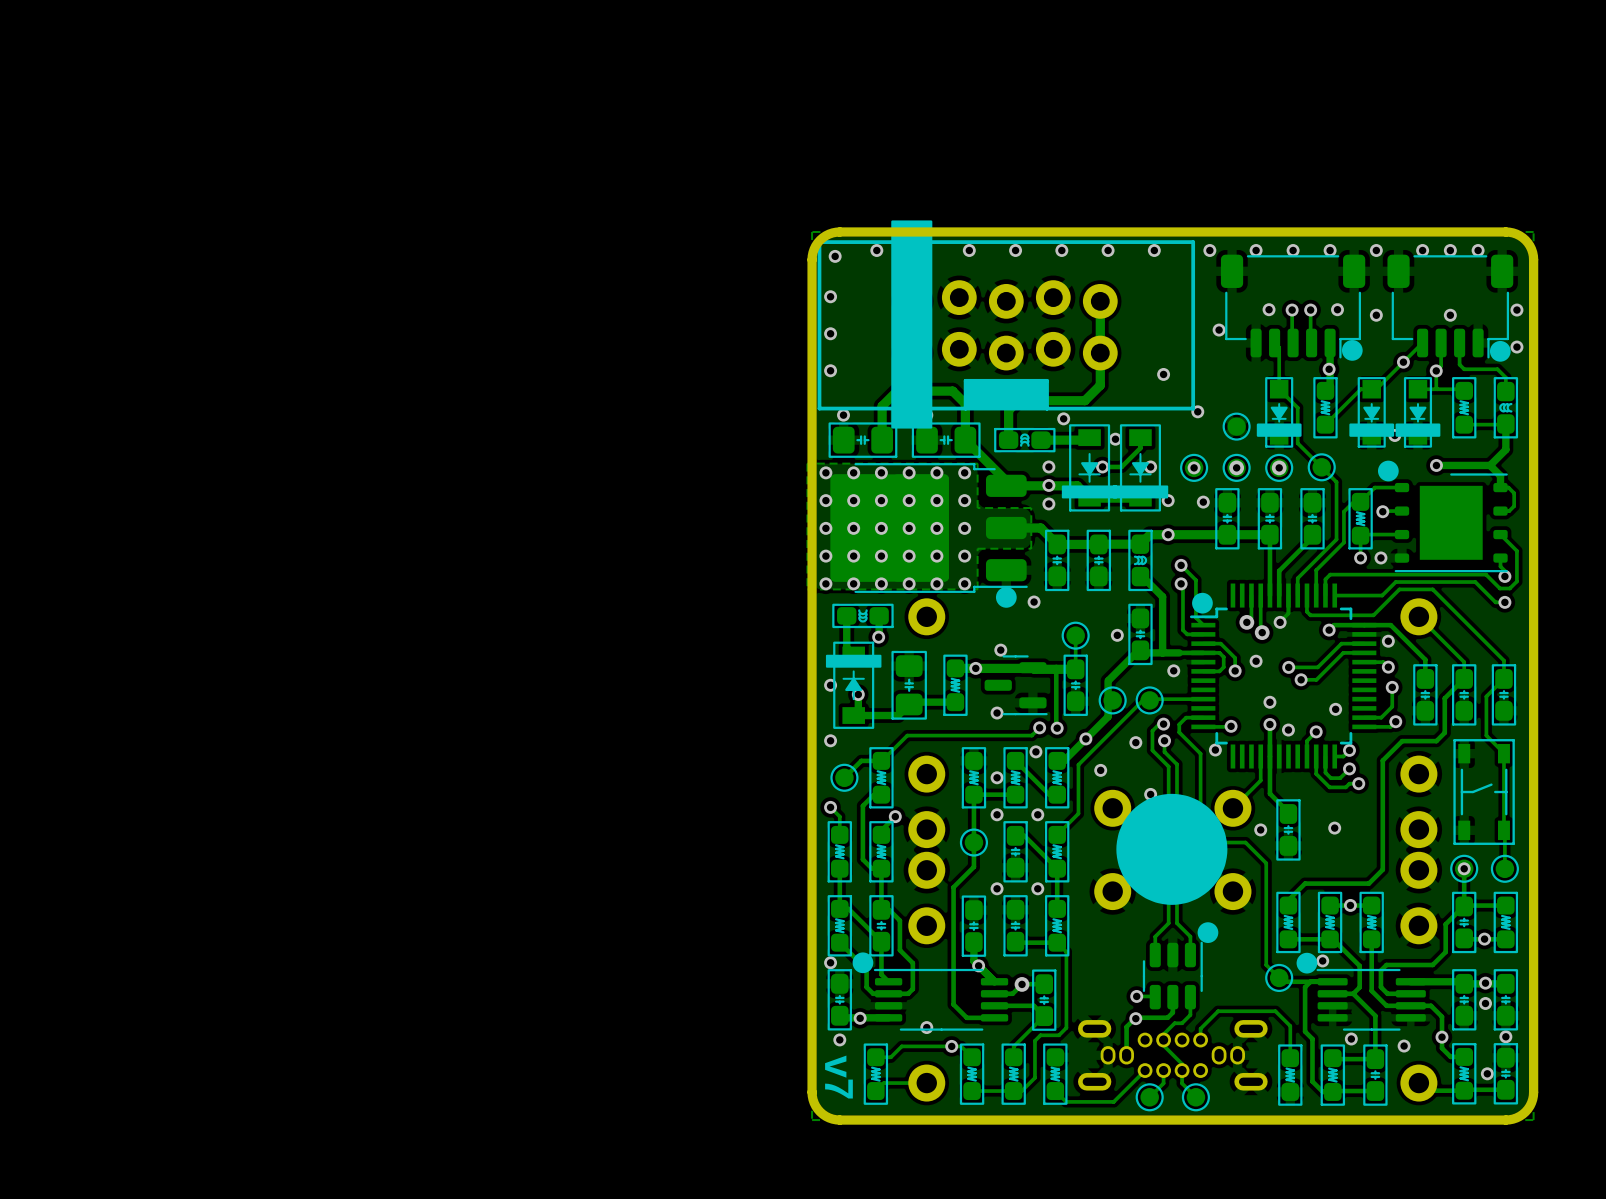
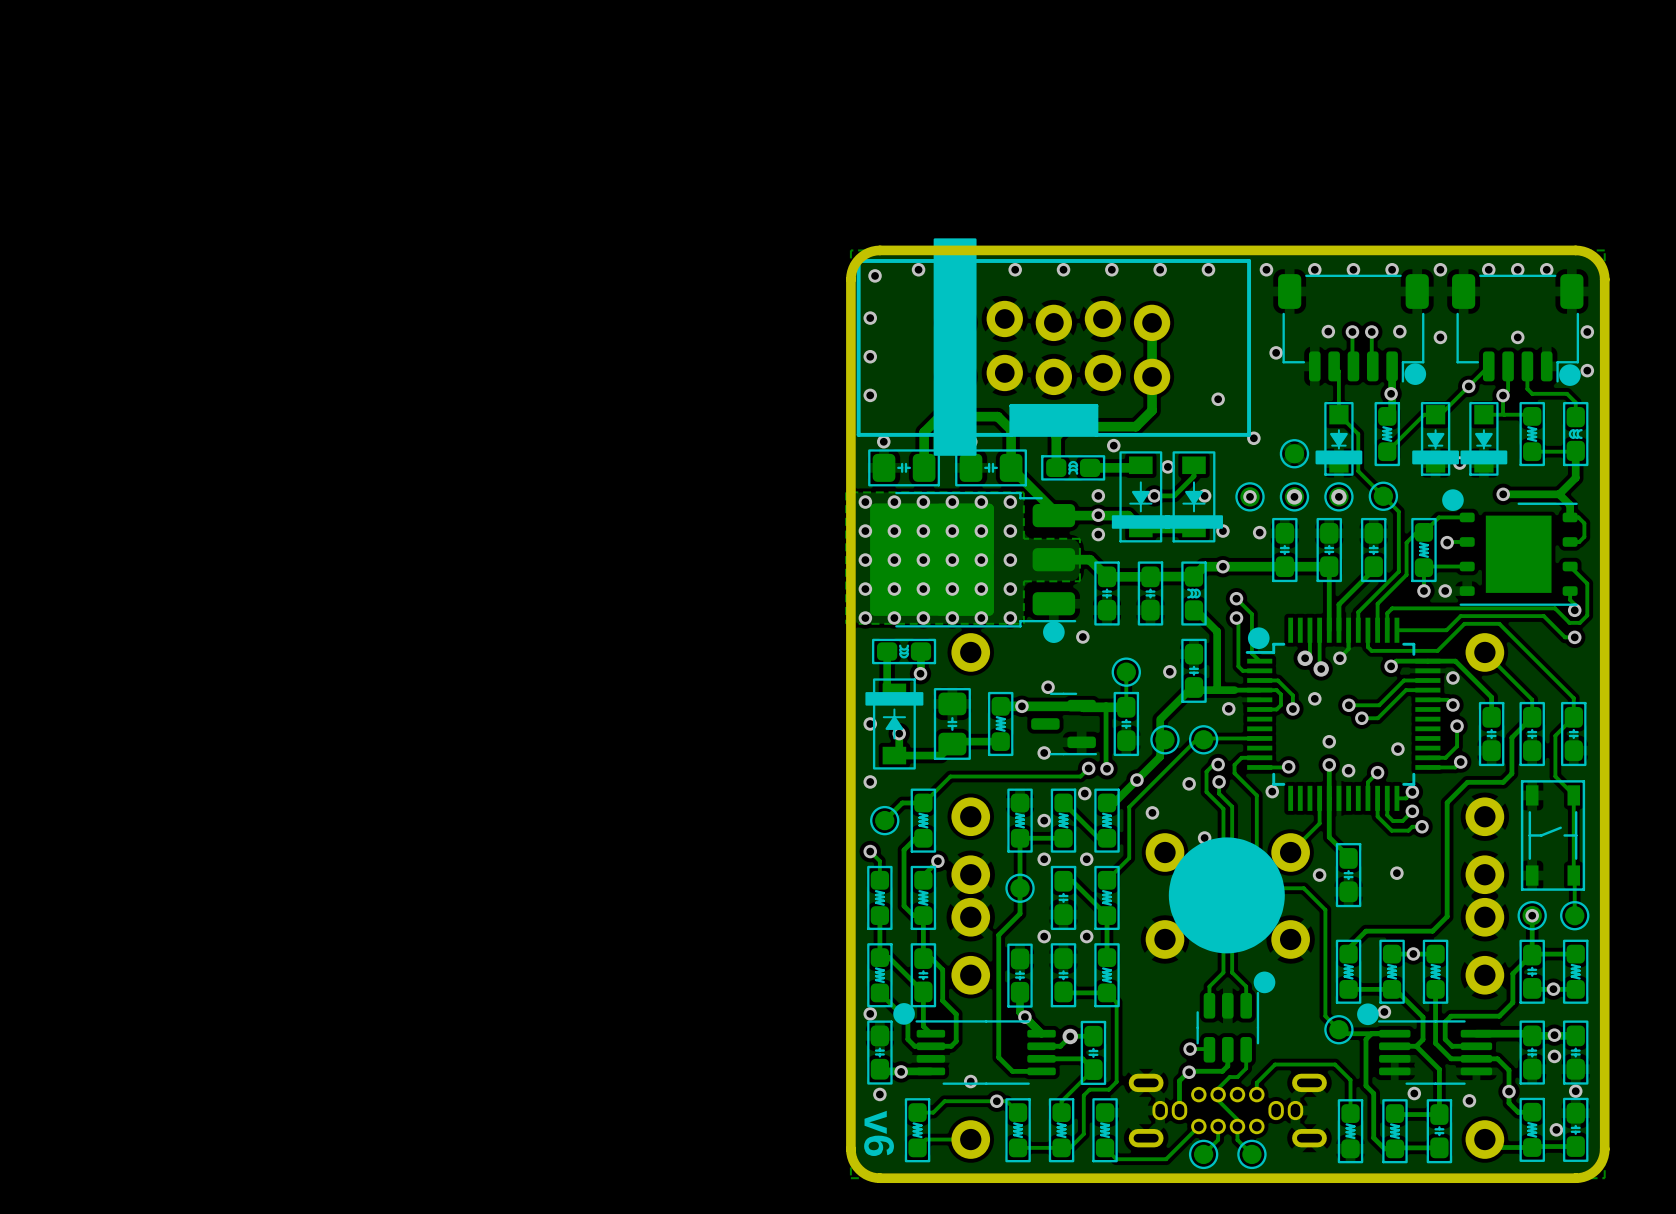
text: v7 (838, 1077) -> v6 (879, 1133)

